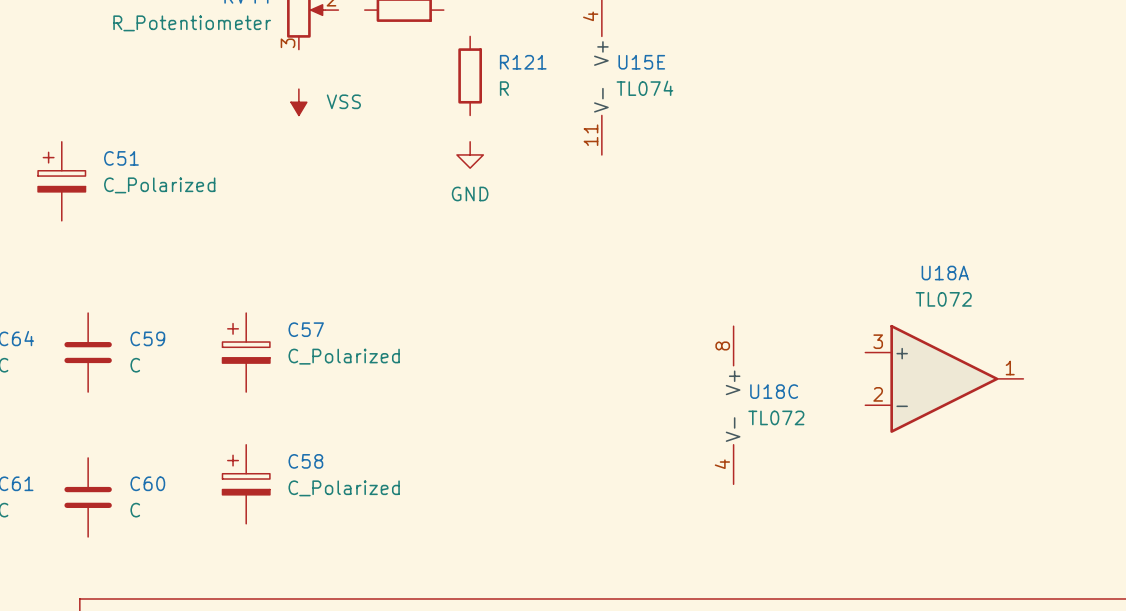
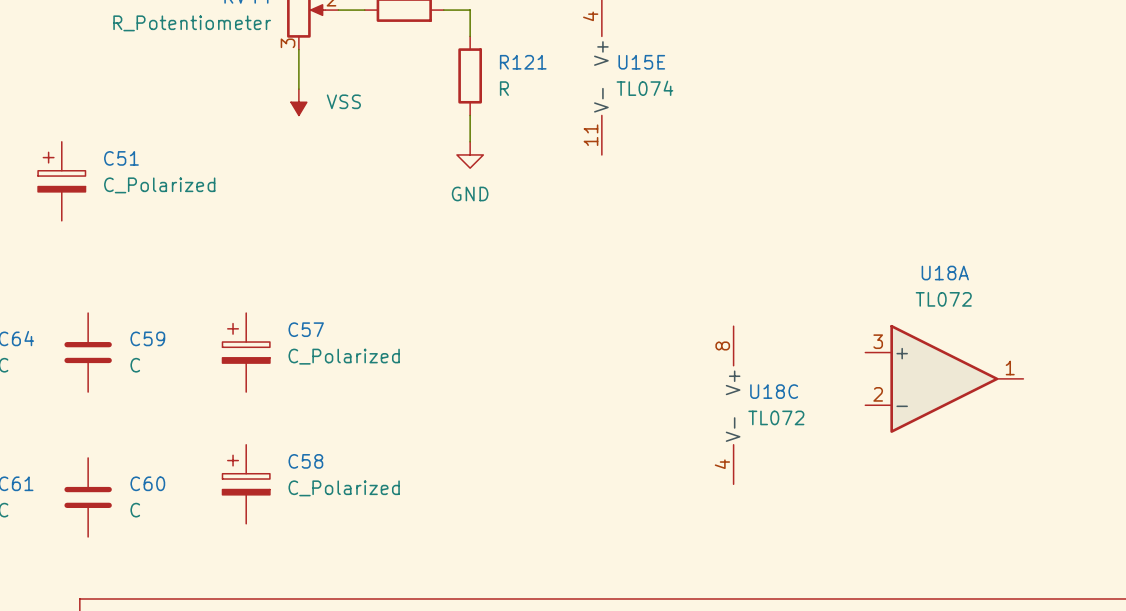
wire: none -> (338, 10) (364, 10)
wire: none -> (443, 10) (470, 10) (470, 36)
wire: none -> (298, 49) (298, 89)
wire: none -> (470, 115) (470, 141)

